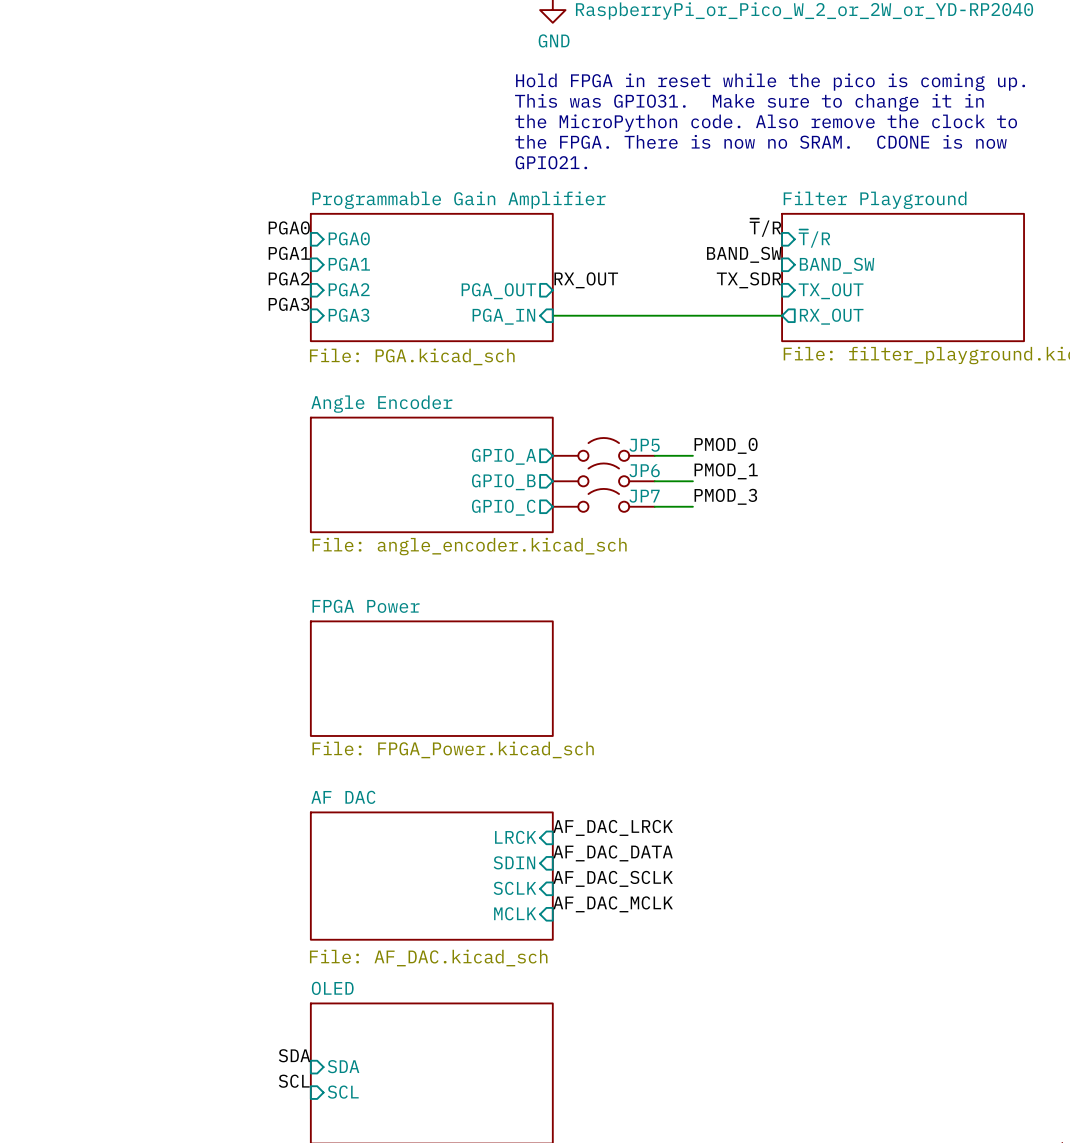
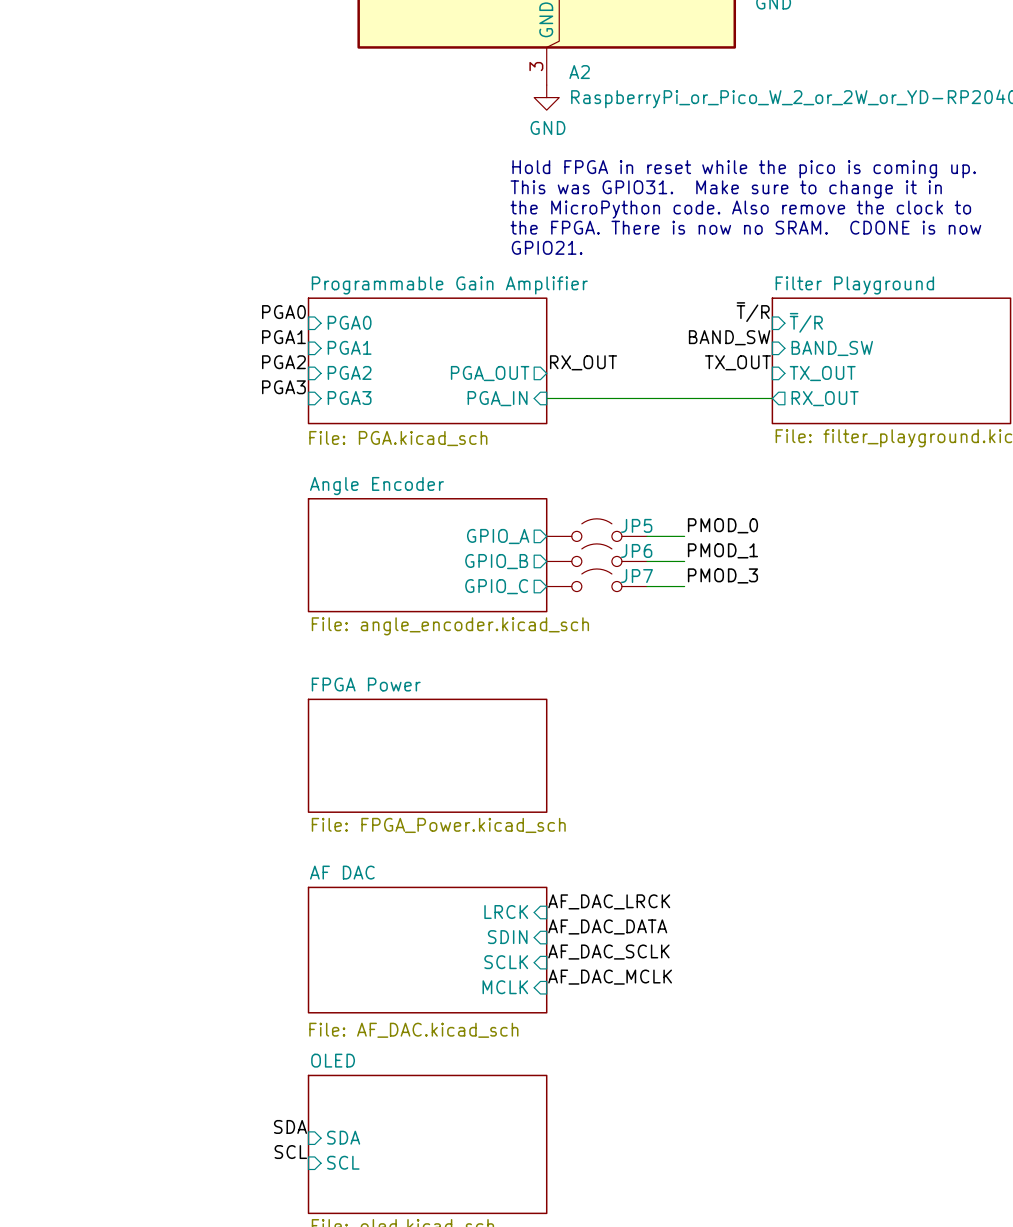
label: TX_SDR (748, 280) -> TX_OUT (737, 362)

